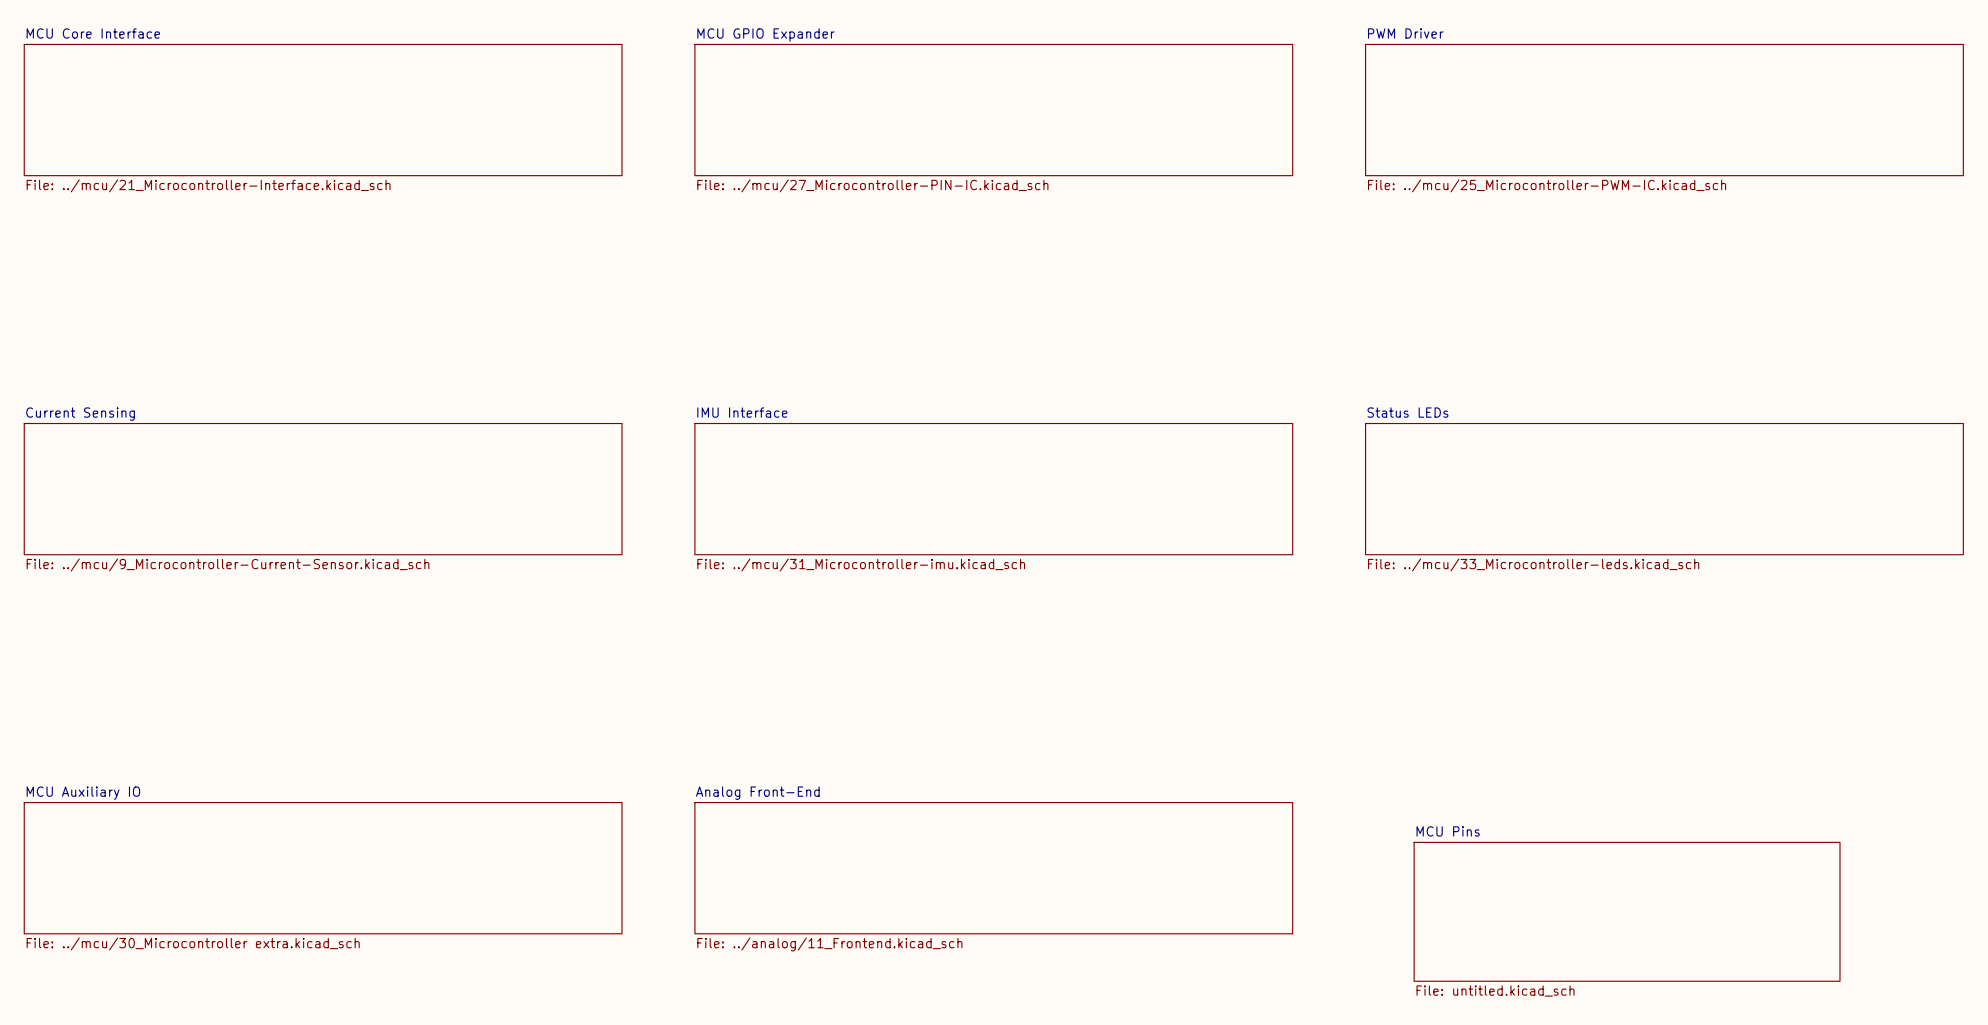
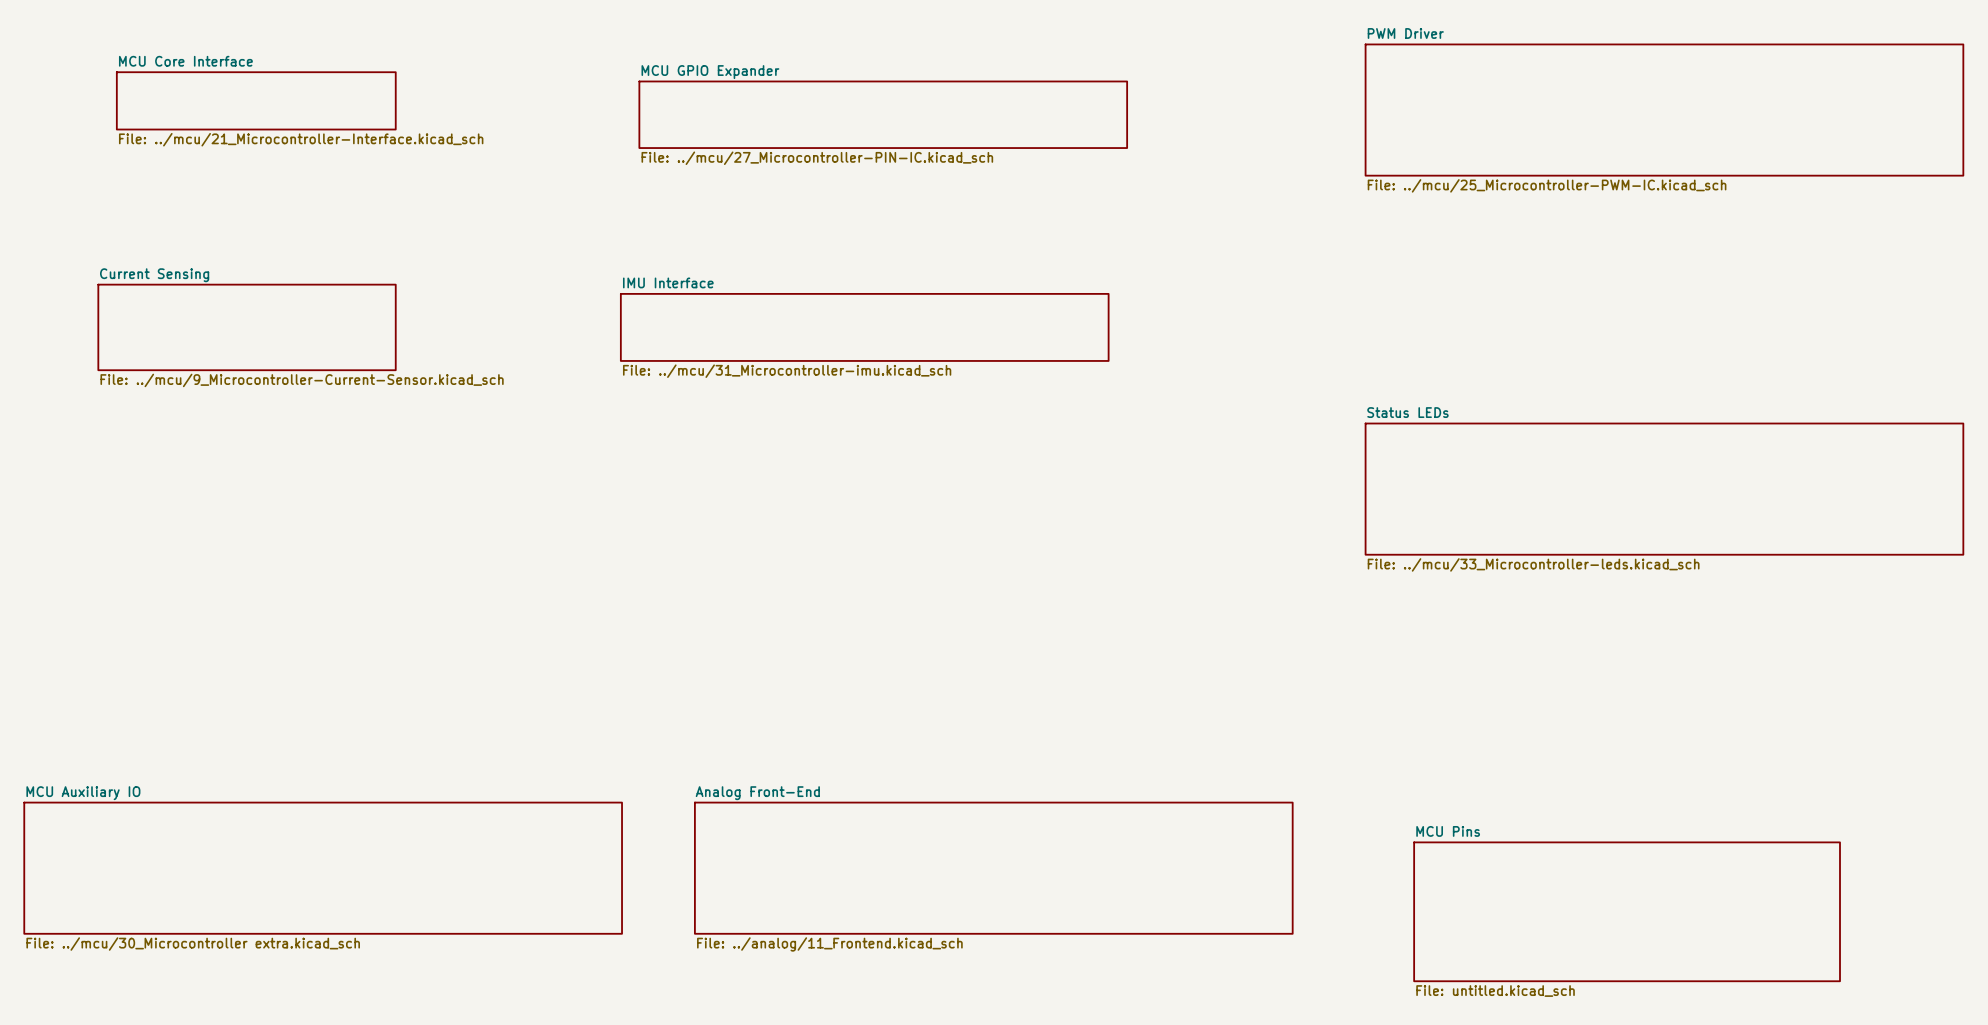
sheet MCU Core Interface: none -> File: ../mcu/21_Microcontroller-Interface.kicad_sch (256, 100)
sheet MCU Core Interface: File: ../mcu/21_Microcontroller-Interface.kicad_sch (323, 110) -> none
sheet MCU GPIO Expander: File: ../mcu/27_Microcontroller-PIN-IC.kicad_sch (993, 110) -> none
sheet MCU GPIO Expander: none -> File: ../mcu/27_Microcontroller-PIN-IC.kicad_sch (883, 114)
sheet Current Sensing: none -> File: ../mcu/9_Microcontroller-Current-Sensor.kicad_sch (247, 327)
sheet IMU Interface: none -> File: ../mcu/31_Microcontroller-imu.kicad_sch (864, 327)
sheet Current Sensing: File: ../mcu/9_Microcontroller-Current-Sensor.kicad_sch (323, 489) -> none
sheet IMU Interface: File: ../mcu/31_Microcontroller-imu.kicad_sch (993, 489) -> none

